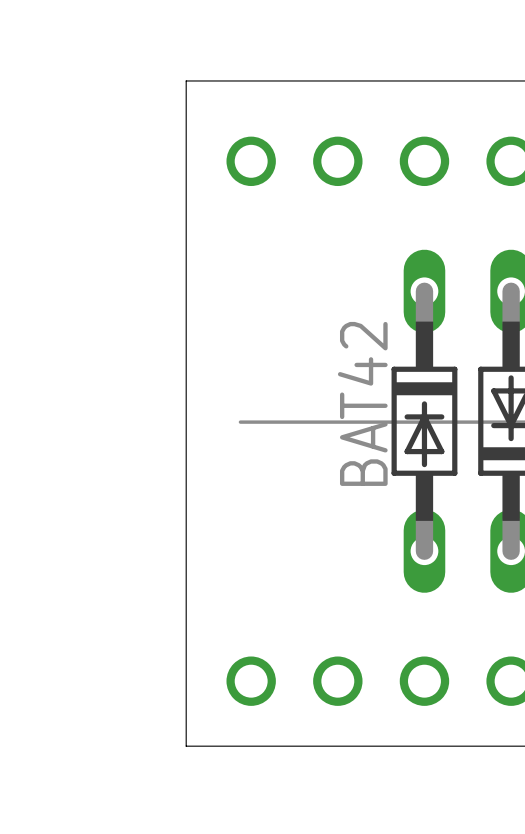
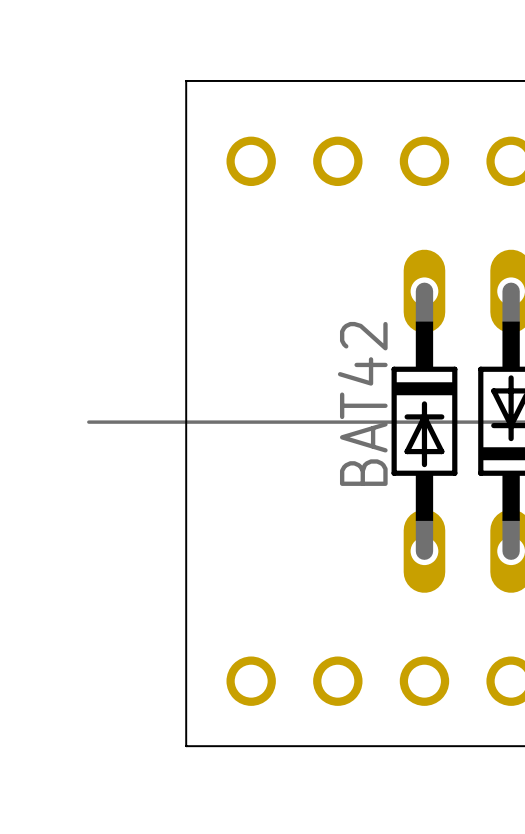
line: none -> (88, 422) (240, 422)

